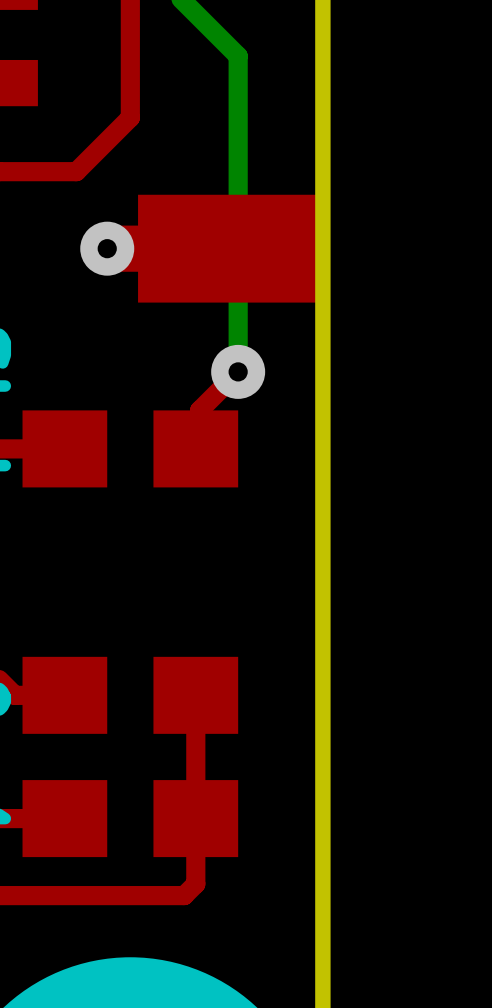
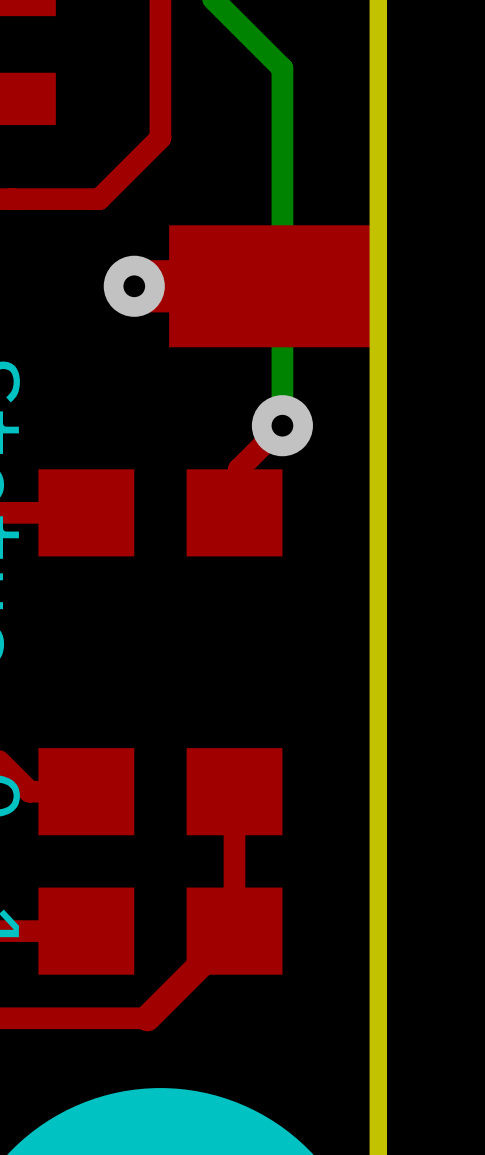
top track: (195, 818) (195, 884) (184, 895) (118, 895) -> (234, 931) (147, 1018)

